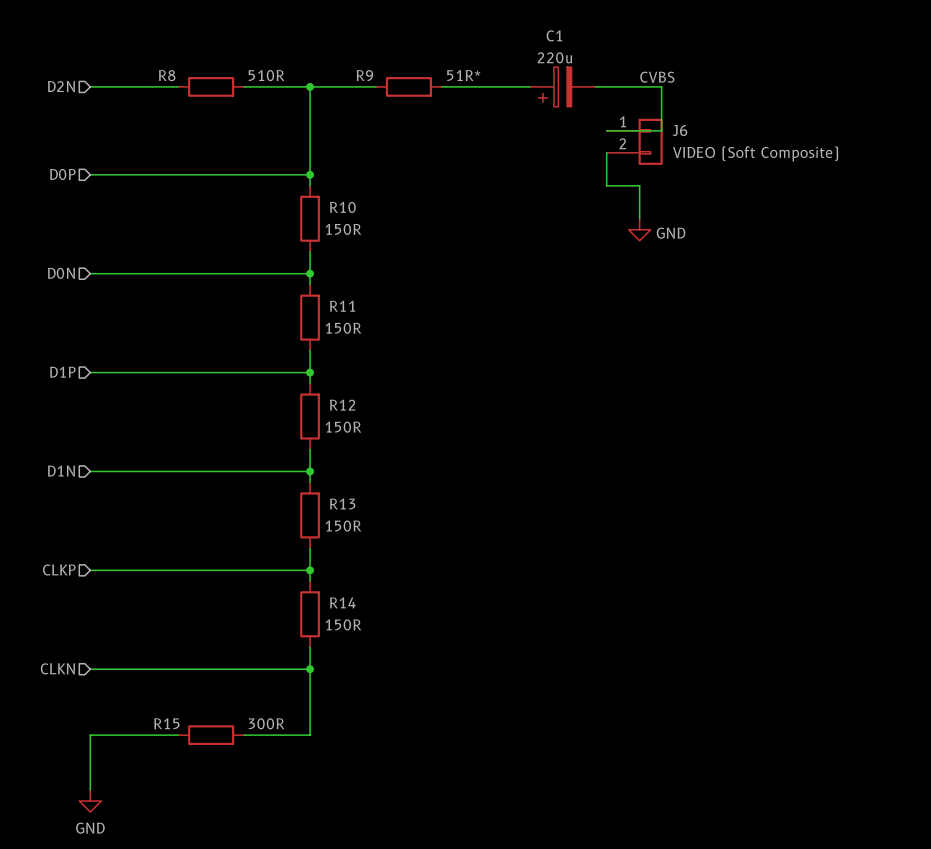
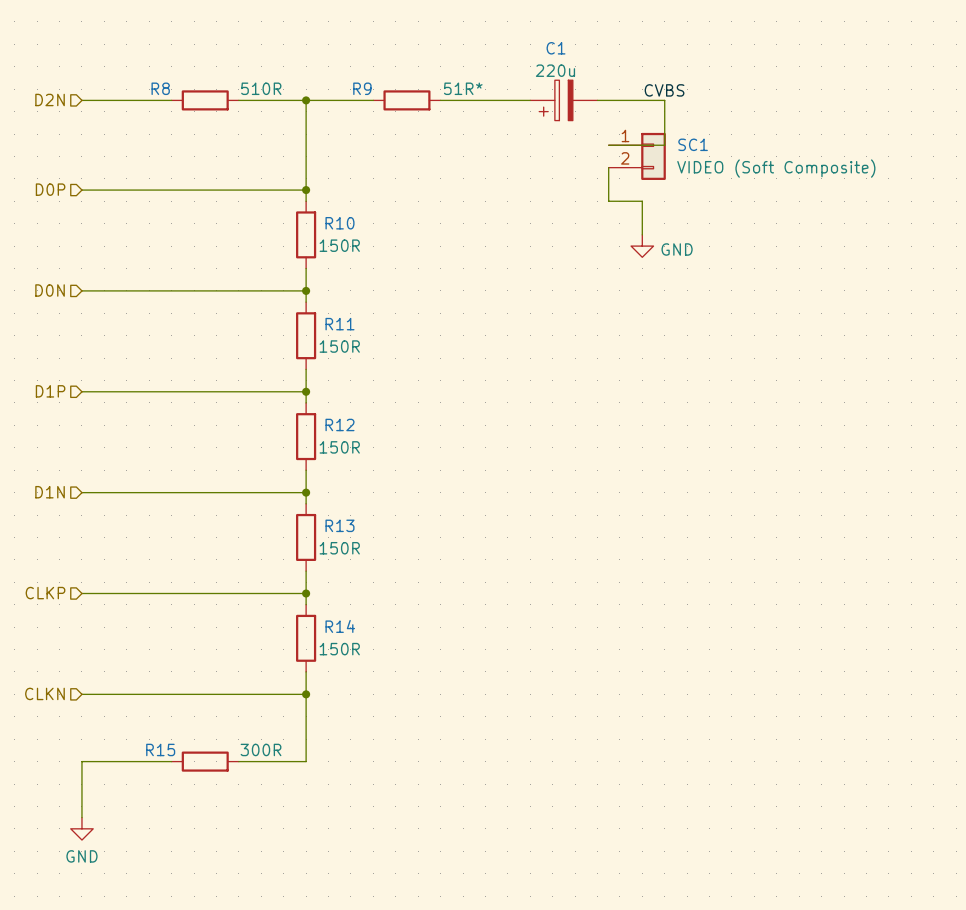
J6 name: J6 (679, 130) -> SC1 (693, 144)

